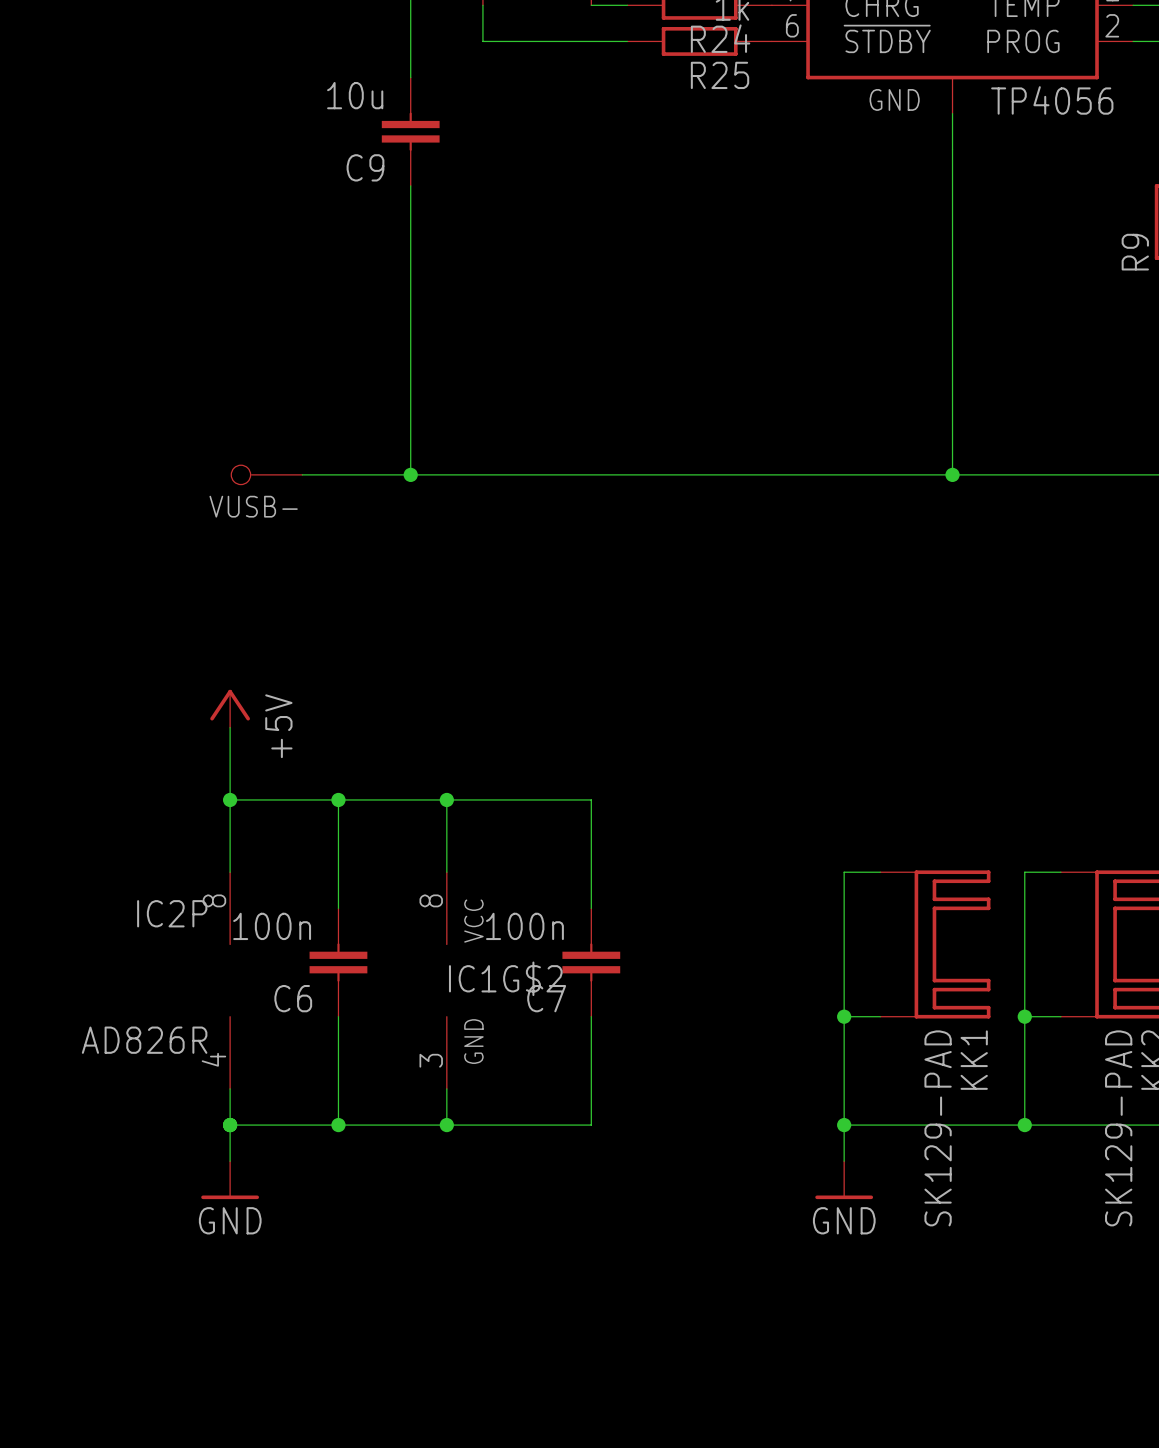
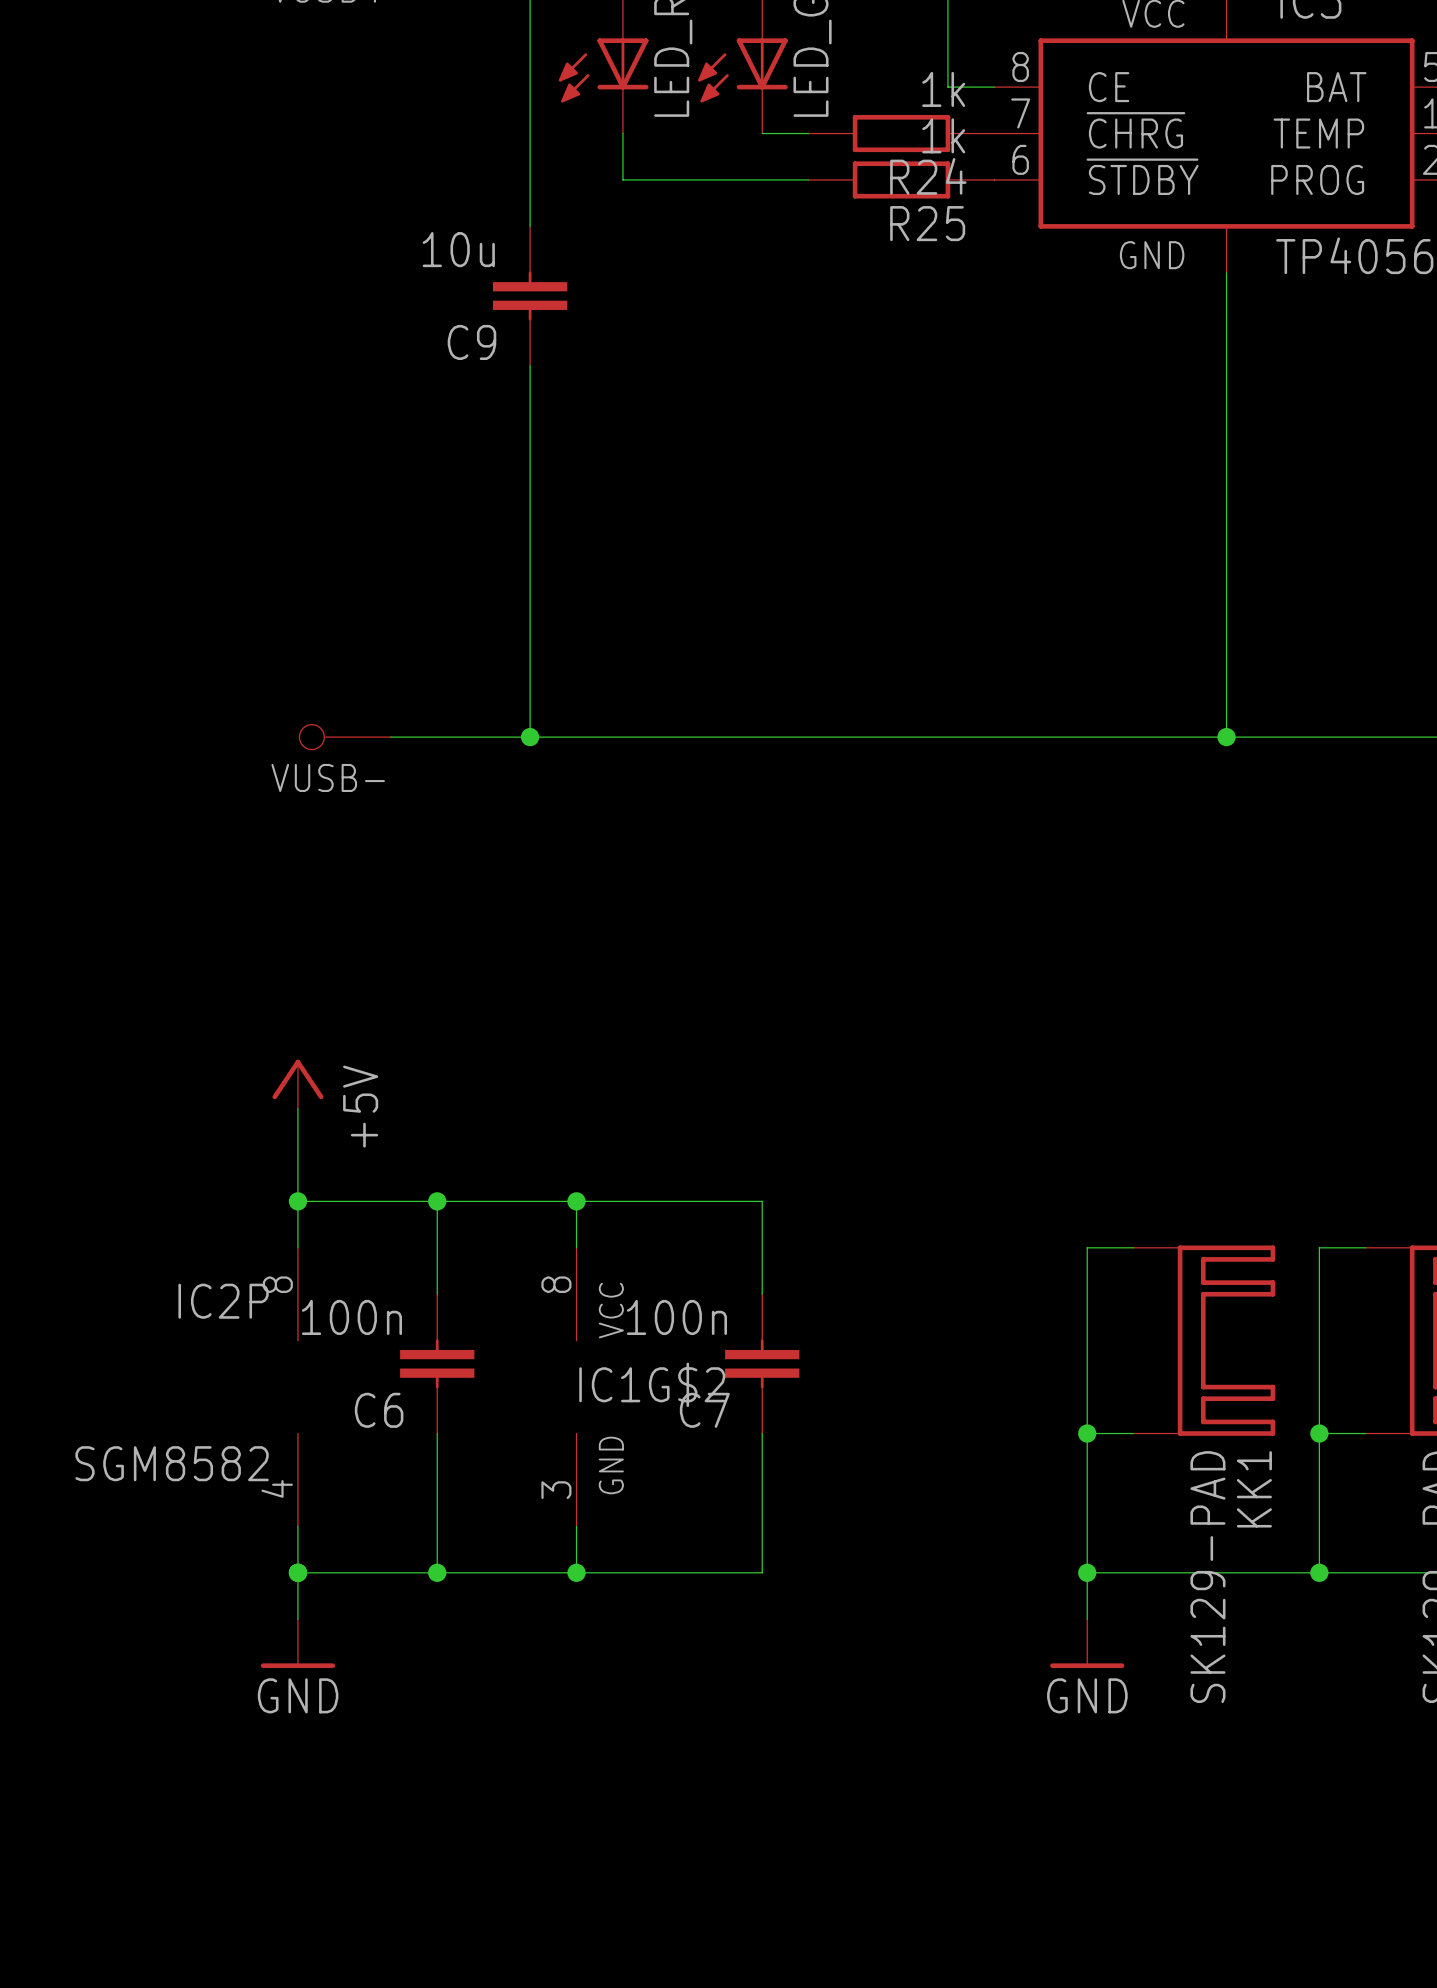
power symbol position: +5V (230, 708) -> +5V (297, 1084)
wire: (230, 799) (591, 799) (591, 836) -> (297, 1201) (762, 1201)
junction position: (230, 799) -> (297, 1201)
wire: (338, 799) (338, 836) -> none
junction position: (338, 799) -> (437, 1201)
wire: (446, 799) (446, 836) -> none
junction position: (446, 799) -> (576, 1201)
IC2P value: AD826R (144, 1040) -> SGM8582 (172, 1463)

